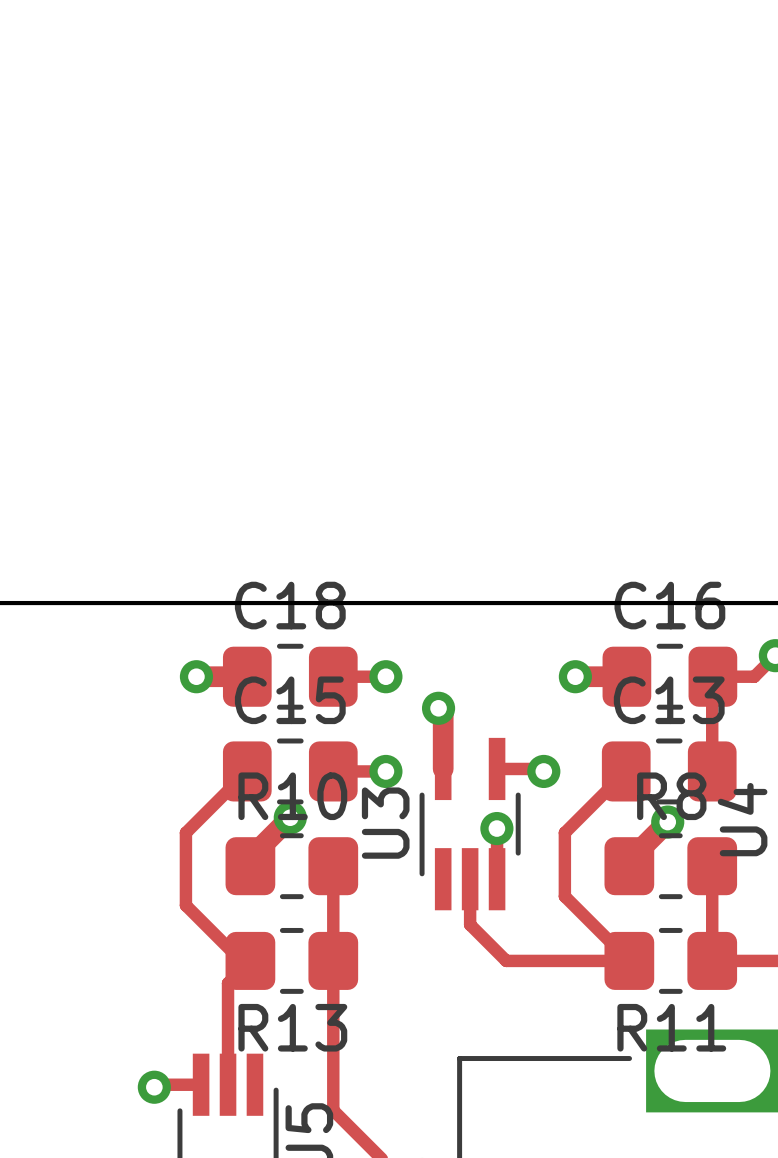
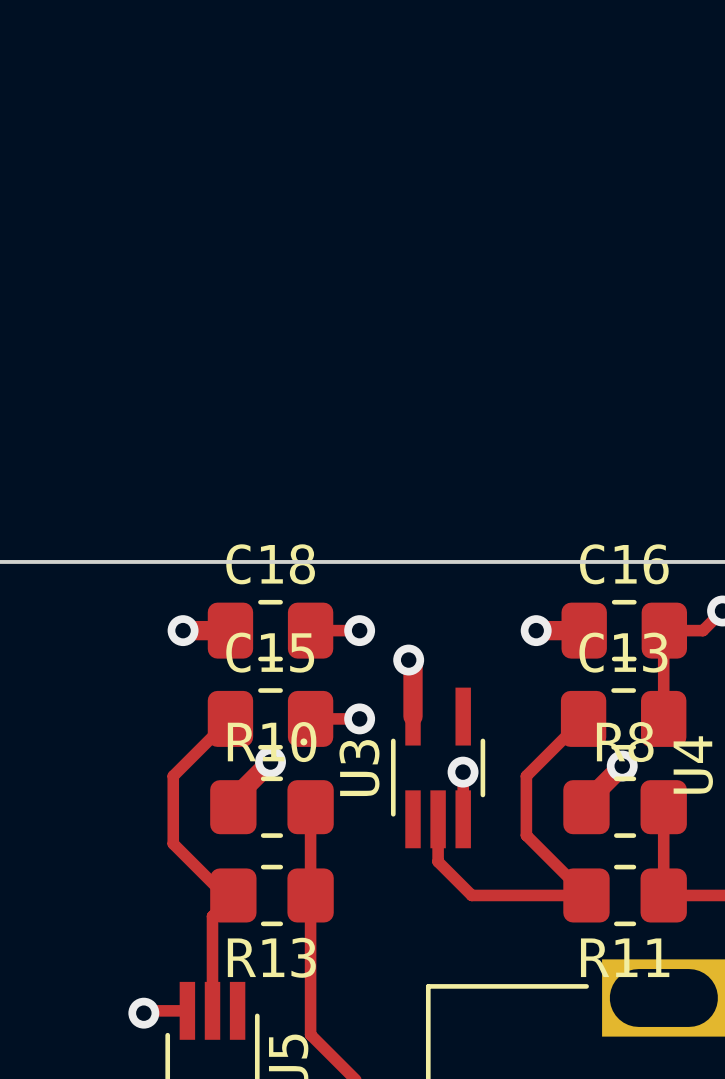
track: (497, 768) (541, 768) (543, 771) -> none
via: (543, 771) -> none

